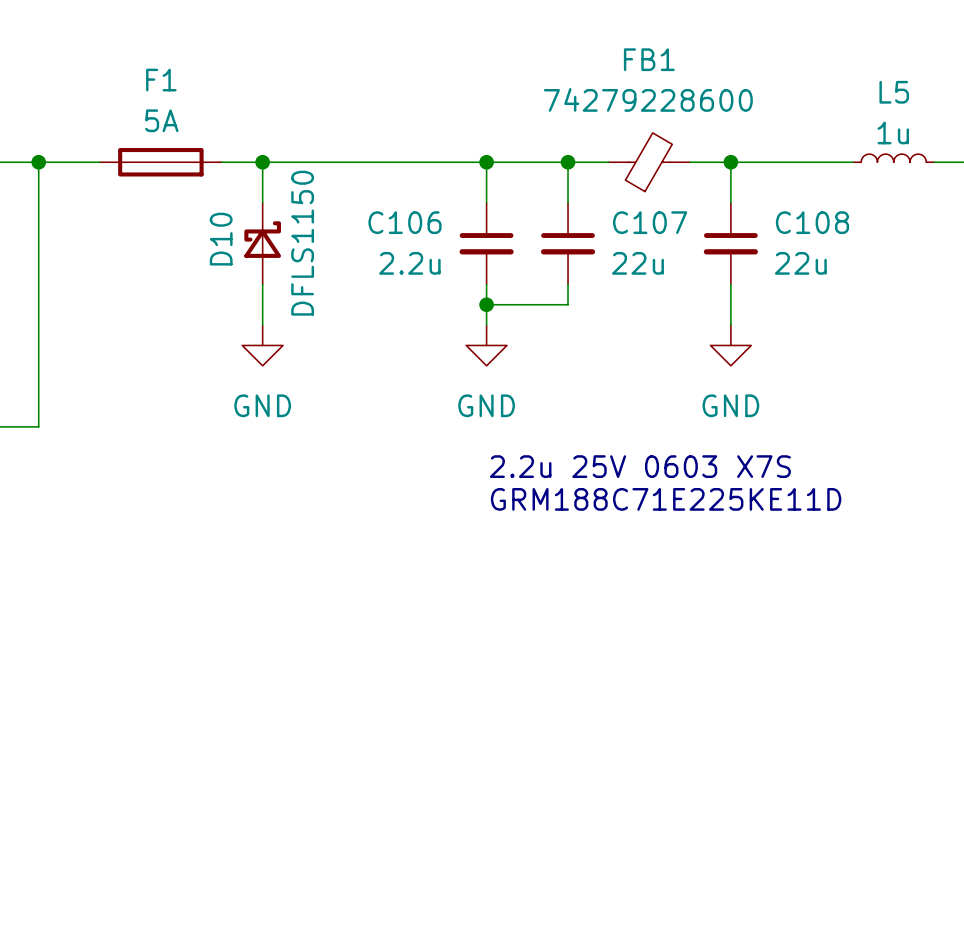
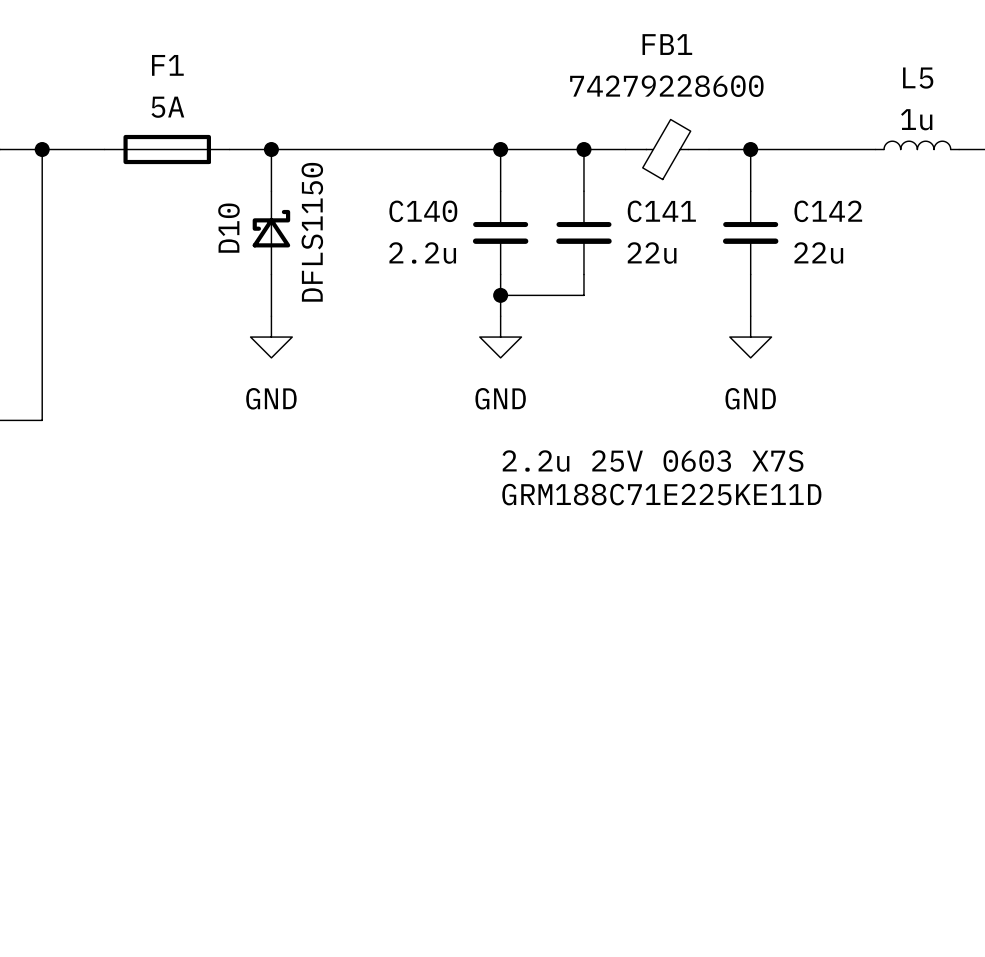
C106 name: C106 (405, 222) -> C140 (423, 211)
C107 name: C107 (650, 222) -> C141 (661, 211)
C108 name: C108 (812, 222) -> C142 (828, 211)

